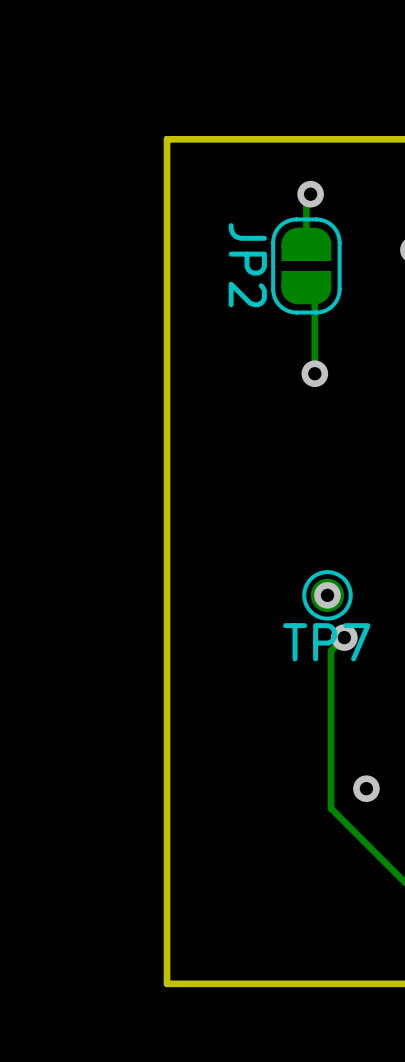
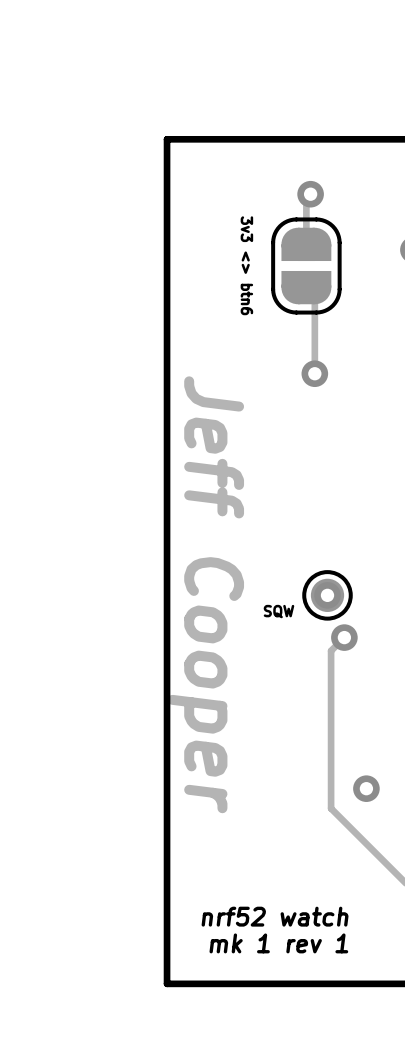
JP2 name: JP2 (247, 265) -> 3v3 <> btn6 (246, 265)
text: none -> Jeff Cooper (205, 594)
TP7 name: TP7 (326, 642) -> SQW (278, 611)
text: none -> nrf52 watch (275, 916)
text: none -> mk 1 rev 1 (278, 943)

